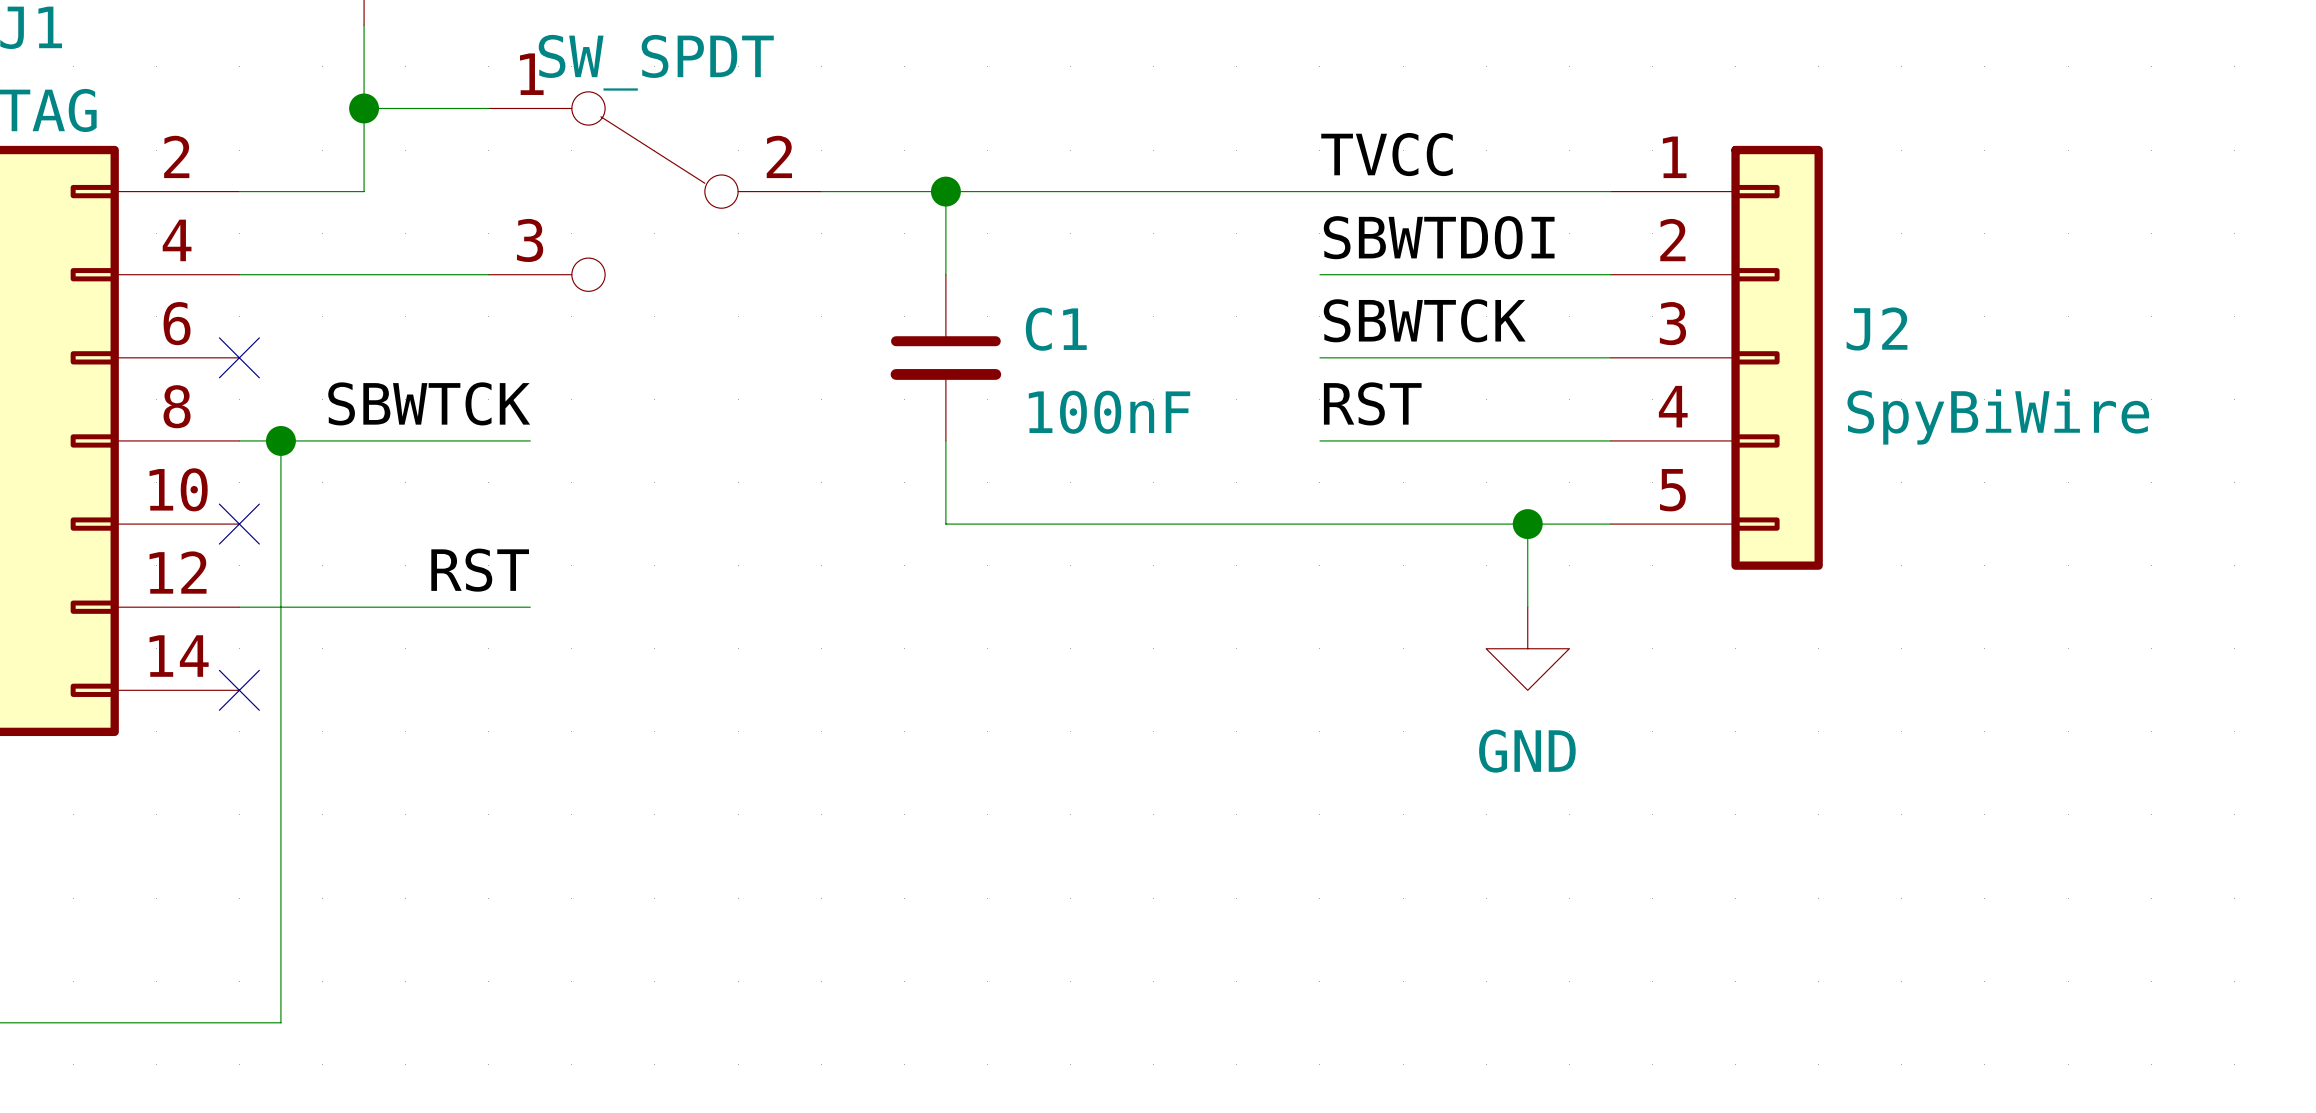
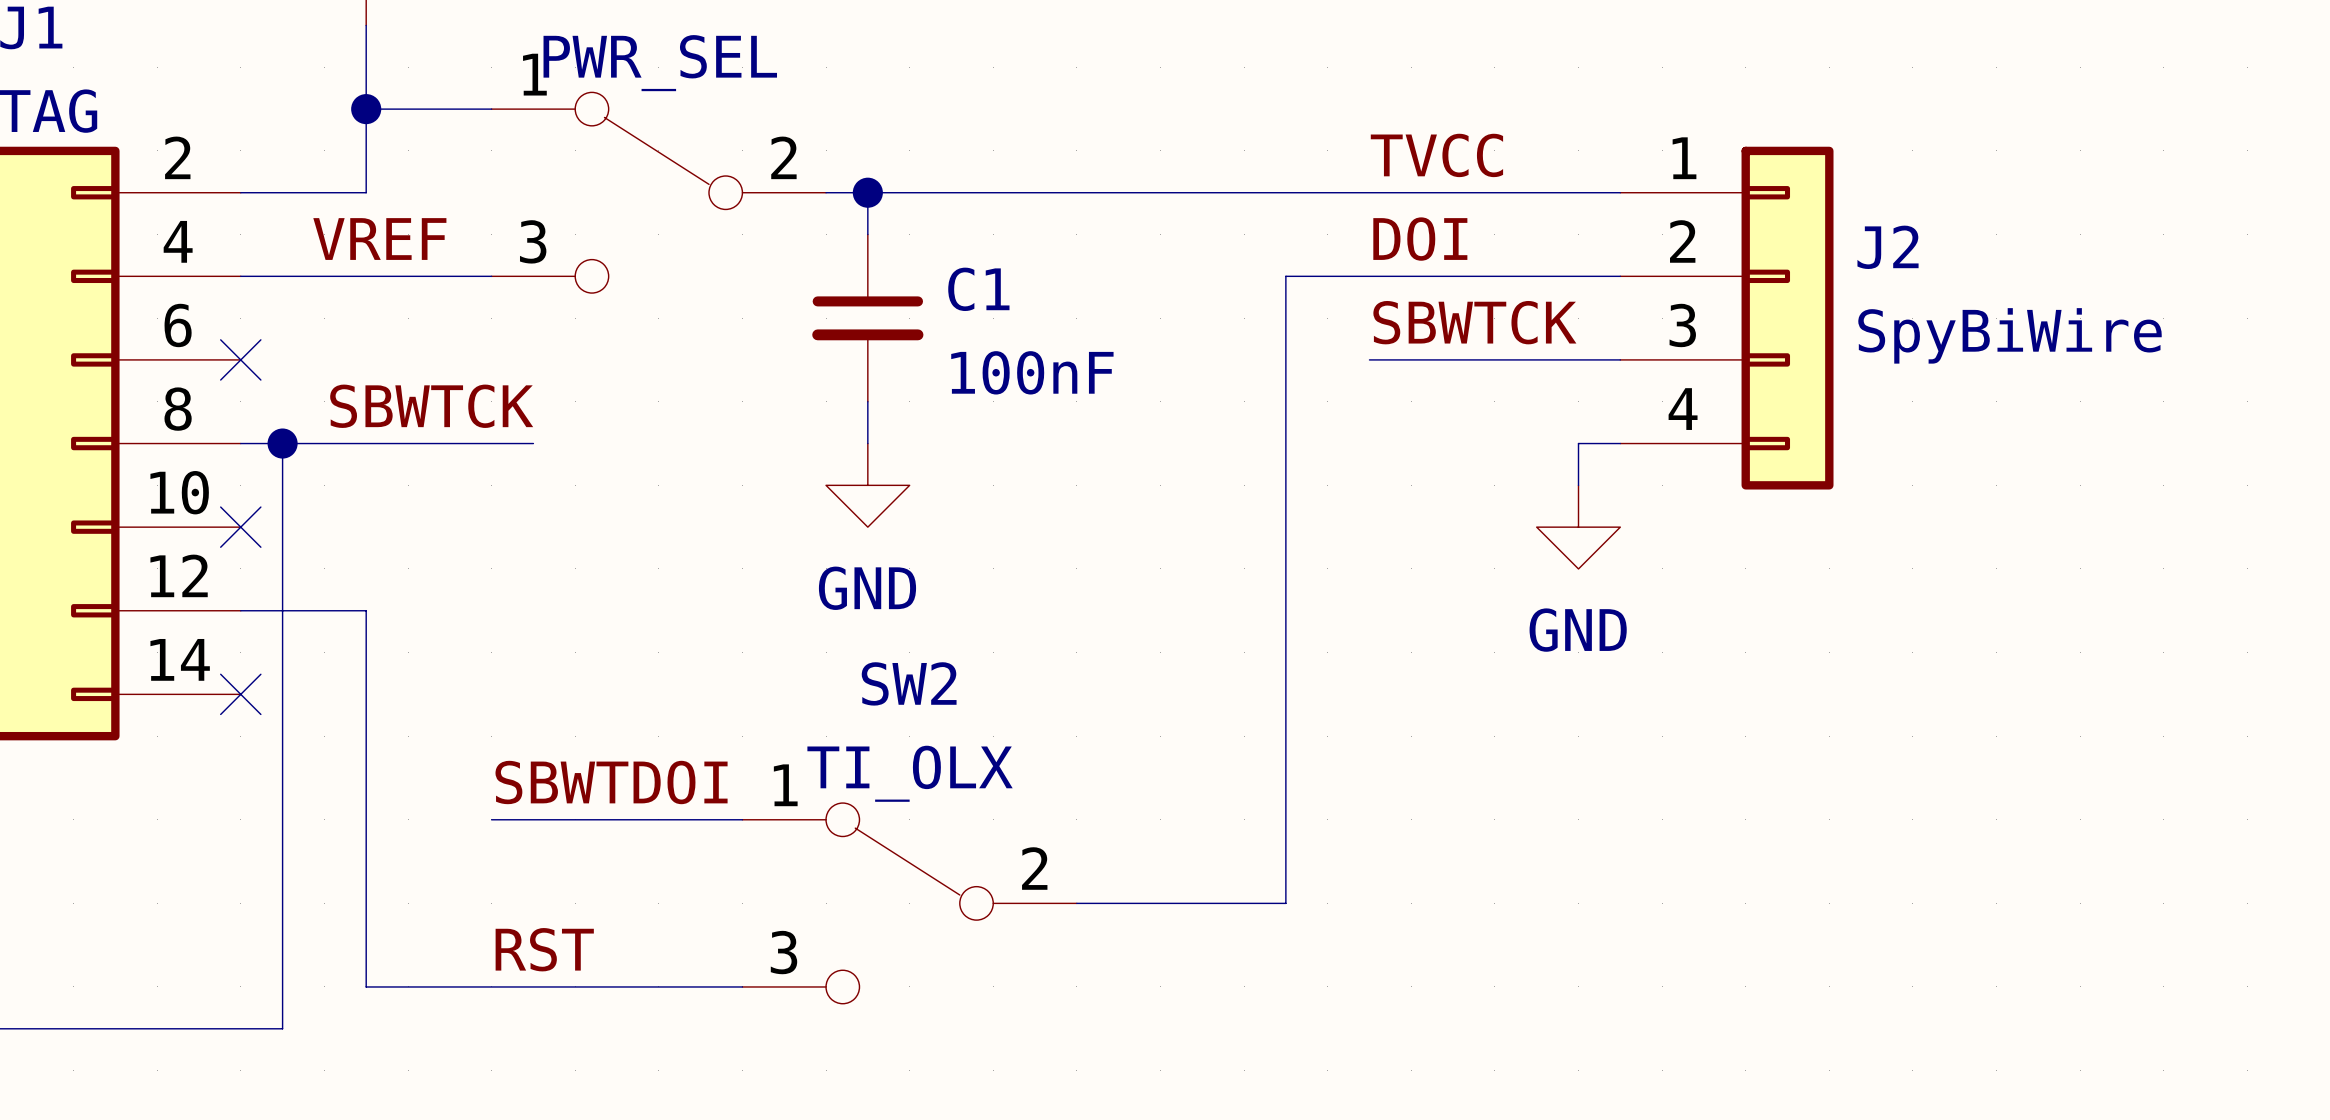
part value: SW_SPDT (656, 62) -> PWR_SEL (660, 63)
J2 symbol: [1610, 145, 1823, 570] -> [1620, 146, 1834, 490]
label position: TVCC (1387, 154) -> TVCC (1436, 155)
wire: none -> (867, 192) (867, 234)
wire: (945, 191) (945, 274) -> none
junction position: (945, 191) -> (867, 192)
label: none -> VREF (379, 239)
label: none -> DOI (1420, 239)
label: SBWTDOI (1439, 237) -> none
wire: none -> (1327, 276) (1285, 276) (1285, 903) (1076, 903)
label position: SBWTCK (1424, 320) -> SBWTCK (1474, 322)
C1 position: (945, 357) -> (867, 318)
wire: (1319, 357) (1361, 357) -> none
wire: none -> (867, 401) (867, 443)
label: RST (1372, 403) -> none
wire: (945, 440) (945, 524) (1610, 524) -> none
wire: (1319, 440) (1569, 440) -> (1578, 485) (1578, 443)
power symbol: none -> GND (867, 485)
wire: (1527, 524) (1527, 607) -> none
junction: (1527, 524) -> none
label position: RST (480, 570) -> RST (544, 949)
wire: (364, 607) (530, 607) -> (366, 610) (366, 986) (742, 986)
power symbol position: GND (1527, 648) -> GND (1578, 527)
label: none -> SBWTDOI (611, 782)
wire: none -> (491, 819) (742, 819)
SW2: none -> TI_OLX (909, 903)

